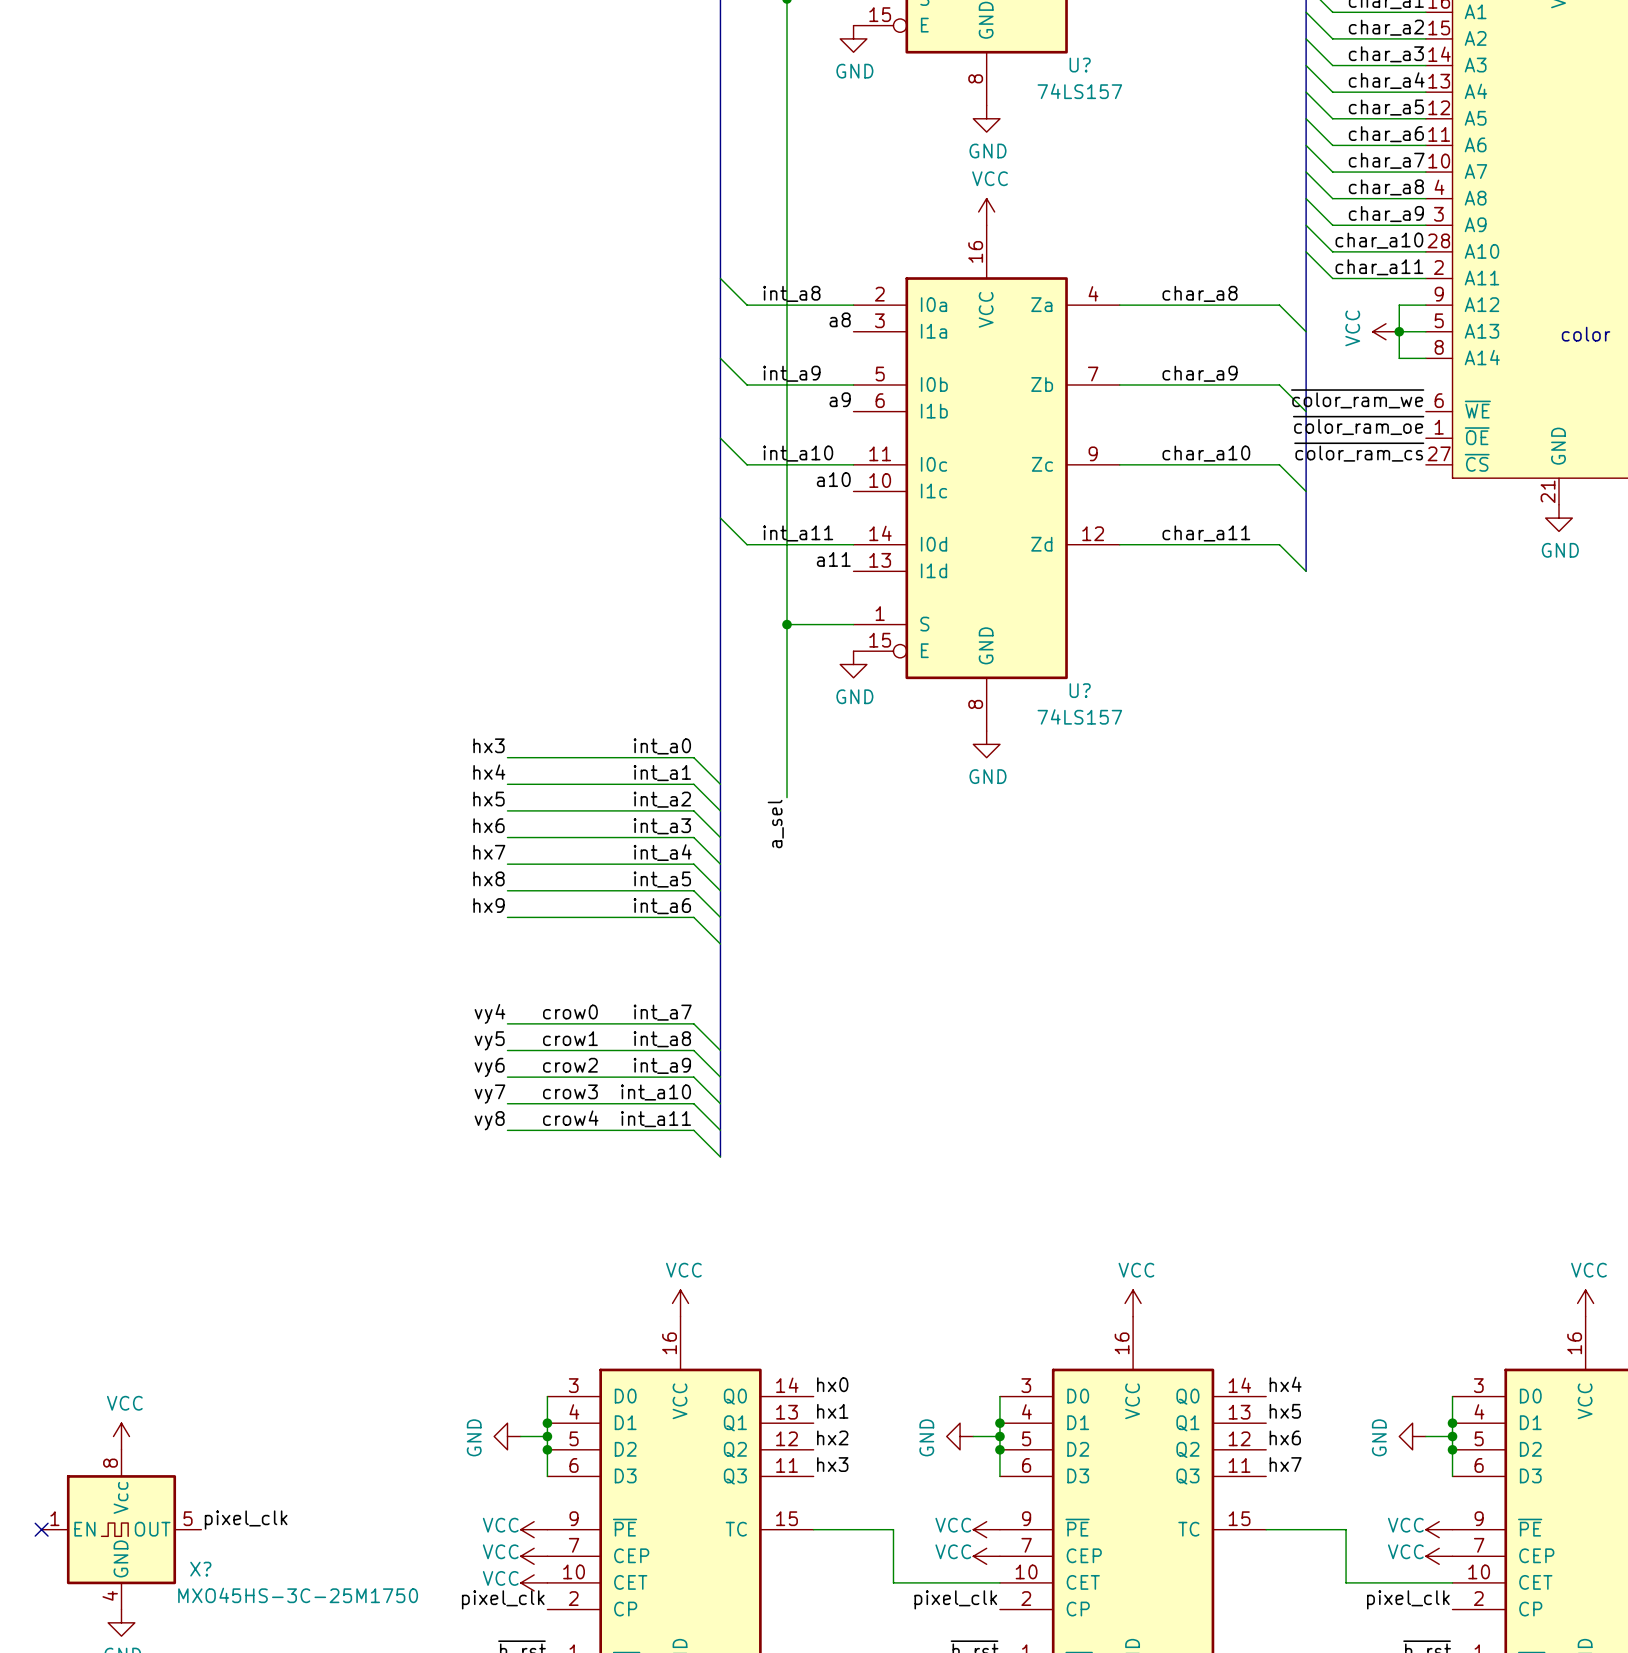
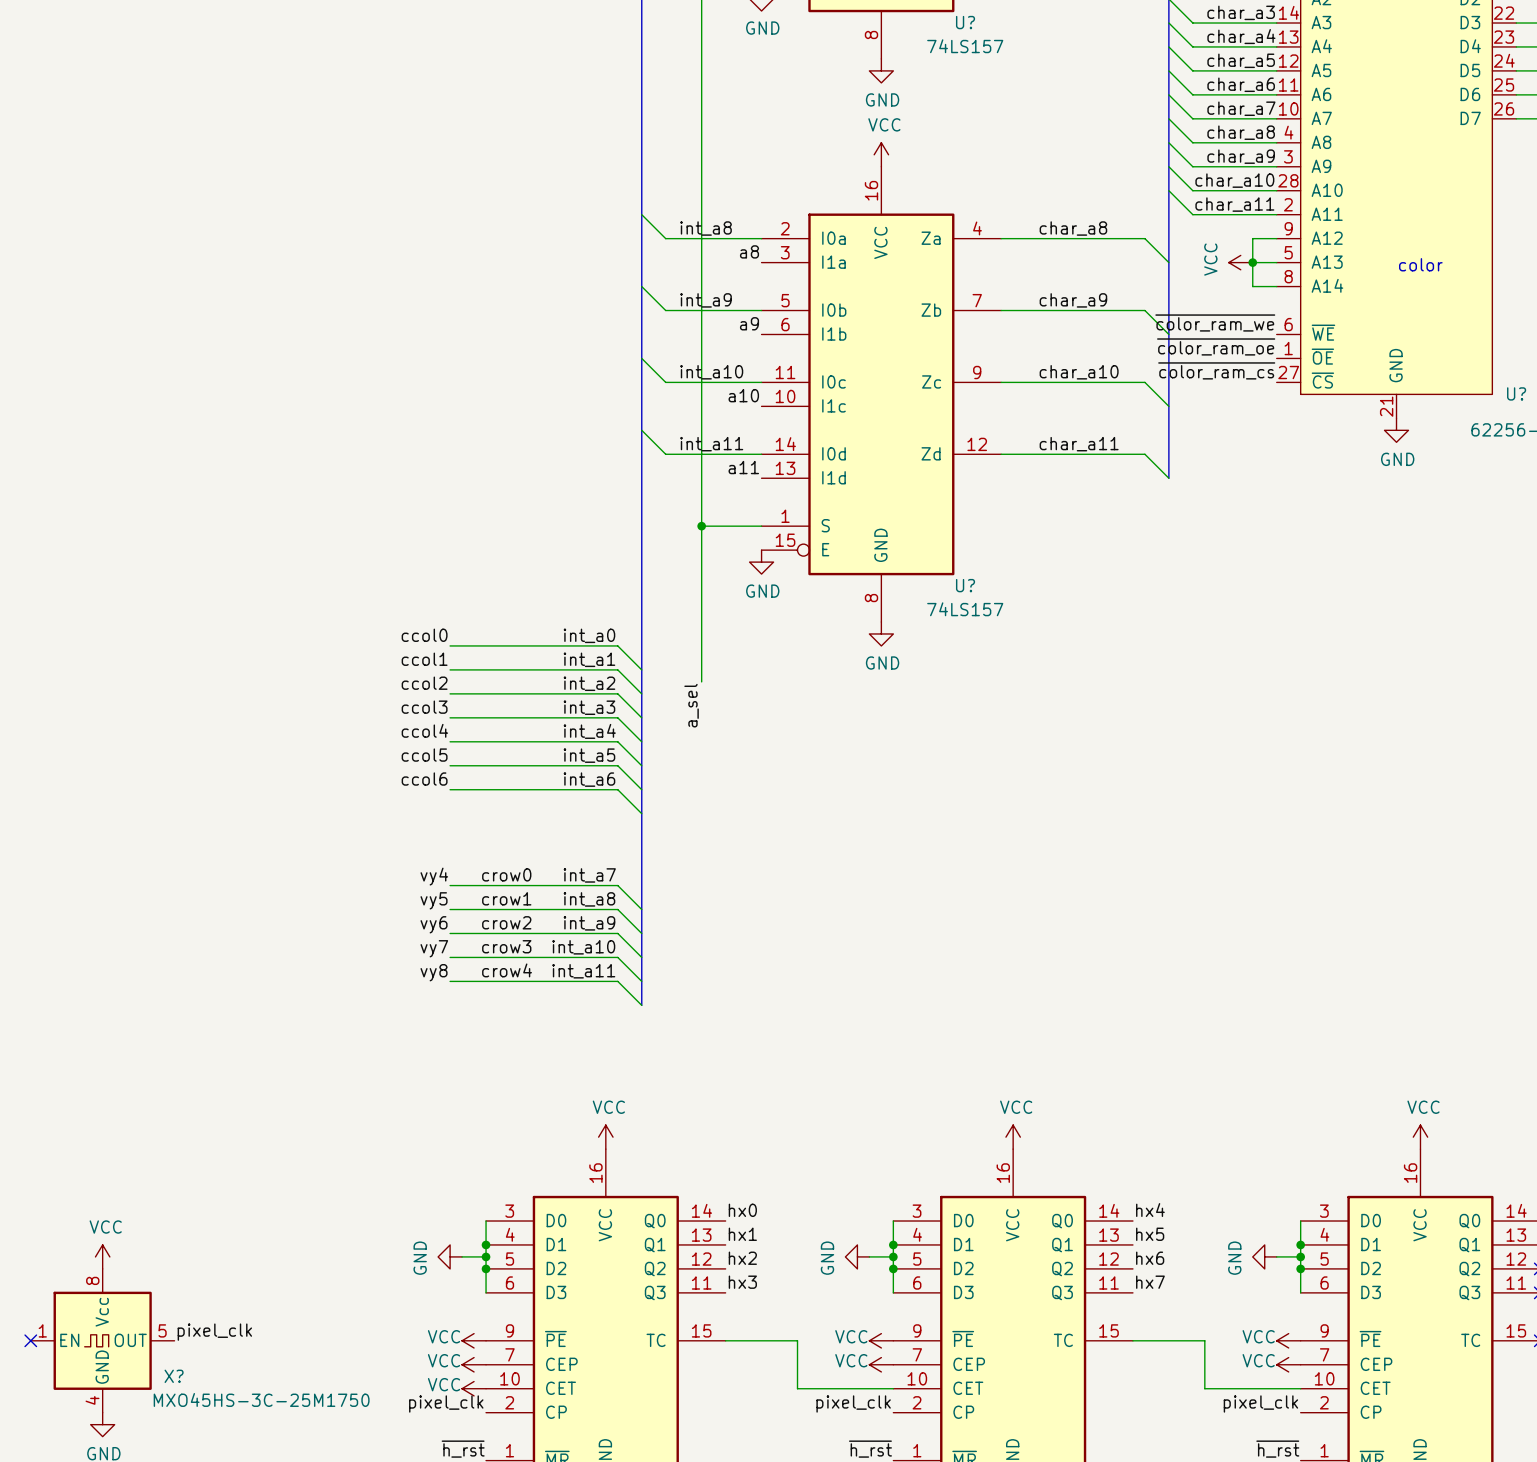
label: hx3 (489, 745) -> ccol0 (424, 635)
label: hx4 (489, 772) -> ccol1 (424, 659)
label: hx5 (489, 799) -> ccol2 (424, 683)
label: hx6 (489, 825) -> ccol3 (424, 707)
label: hx7 (489, 852) -> ccol4 (424, 730)
label: hx8 (489, 878) -> ccol5 (424, 755)
label: hx9 (489, 905) -> ccol6 (424, 779)

